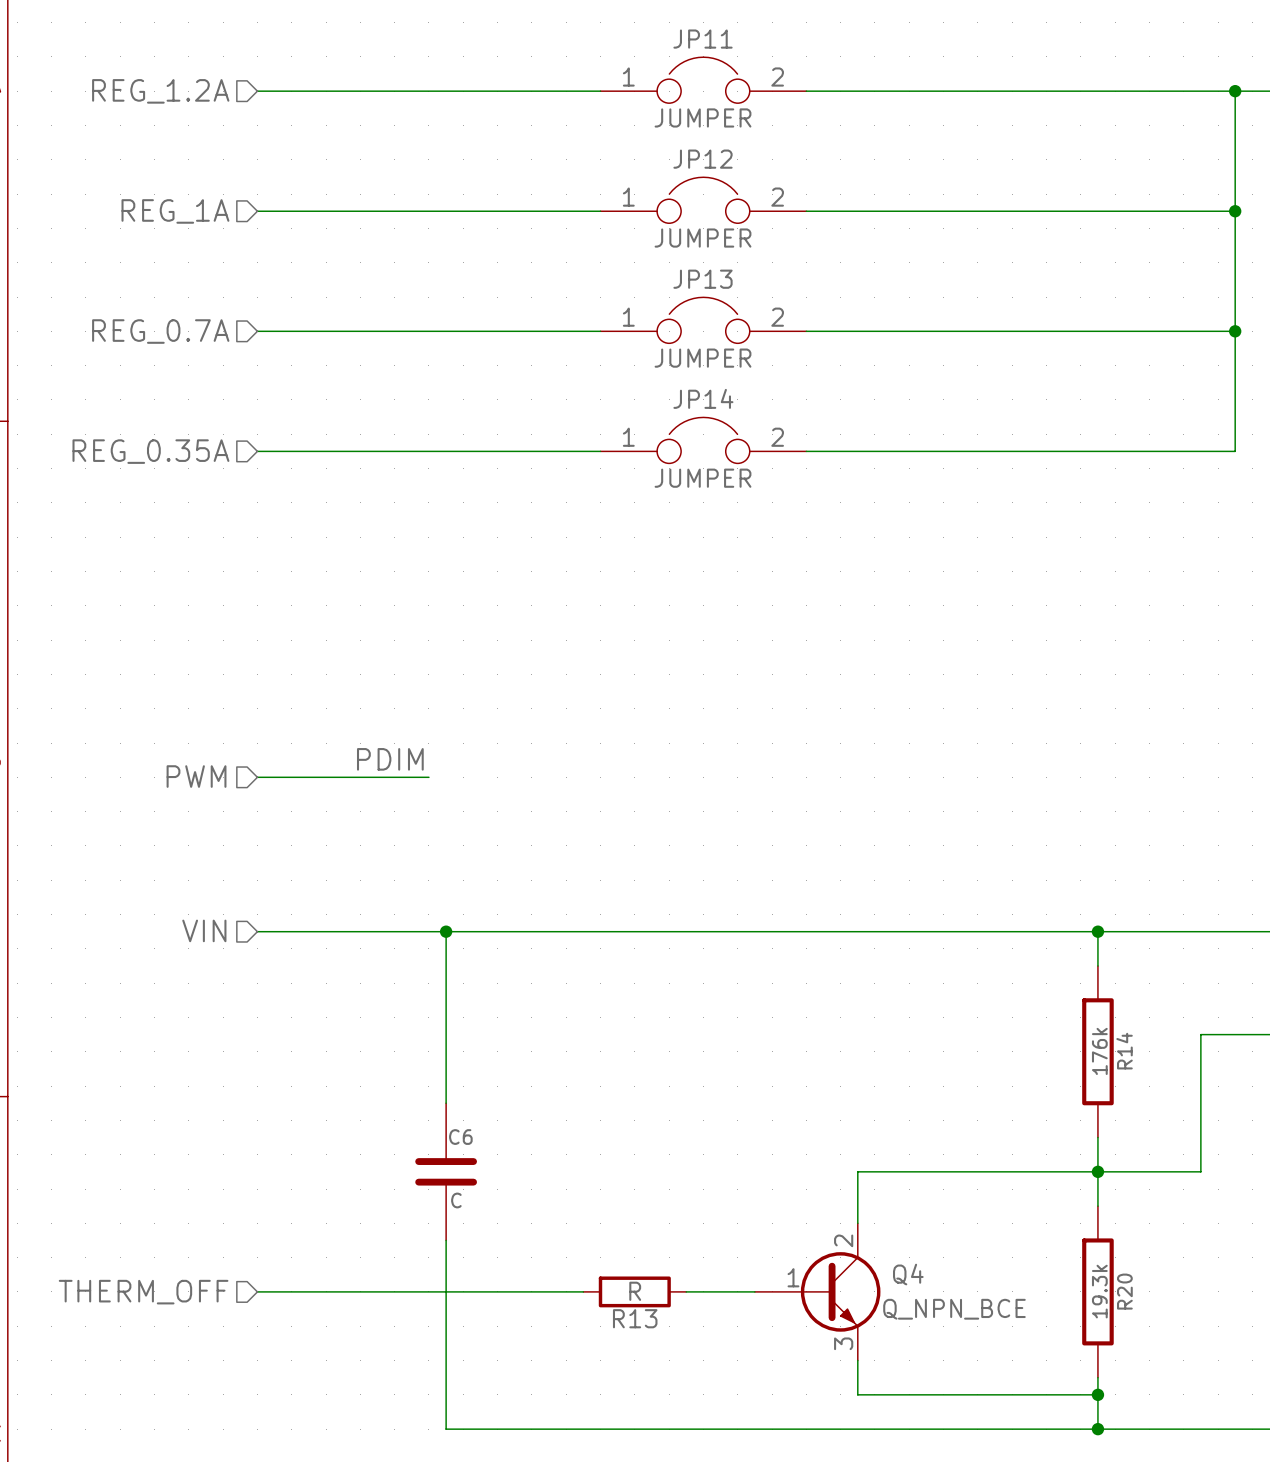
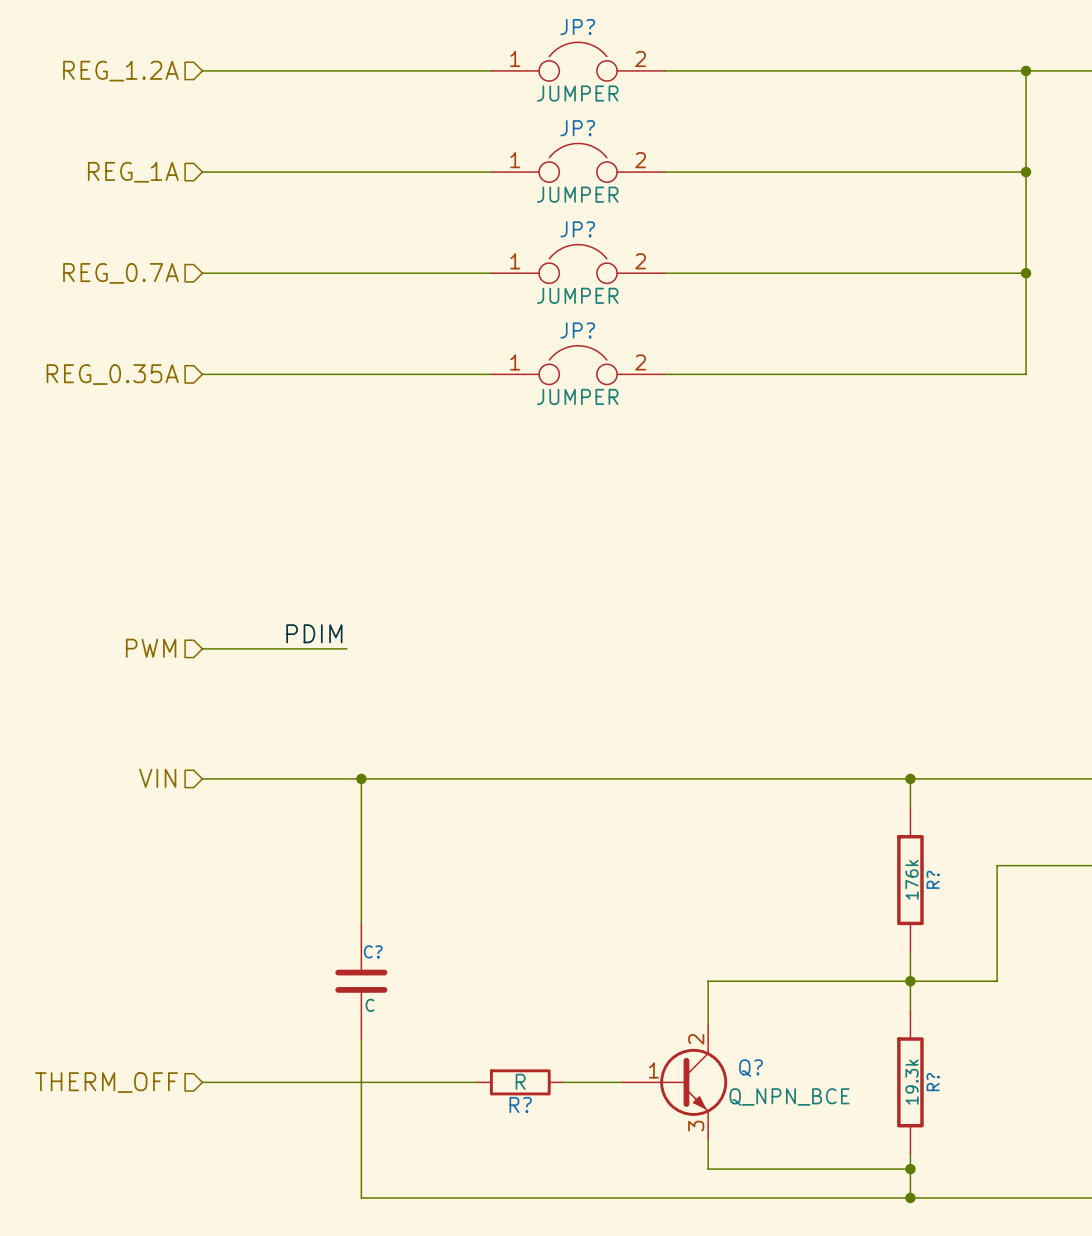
JP11 name: JP11 (703, 39) -> JP? (577, 27)
JP12 name: JP12 (703, 159) -> JP? (577, 128)
JP13 name: JP13 (703, 279) -> JP? (577, 229)
JP14 name: JP14 (703, 398) -> JP? (577, 330)
R14 name: R14 (1124, 1051) -> R? (933, 879)
C6 name: C6 (460, 1137) -> C? (373, 951)
Q4 name: Q4 (908, 1274) -> Q? (751, 1068)
R20 name: R20 (1124, 1291) -> R? (933, 1082)
R13 name: R13 (635, 1318) -> R? (520, 1104)

